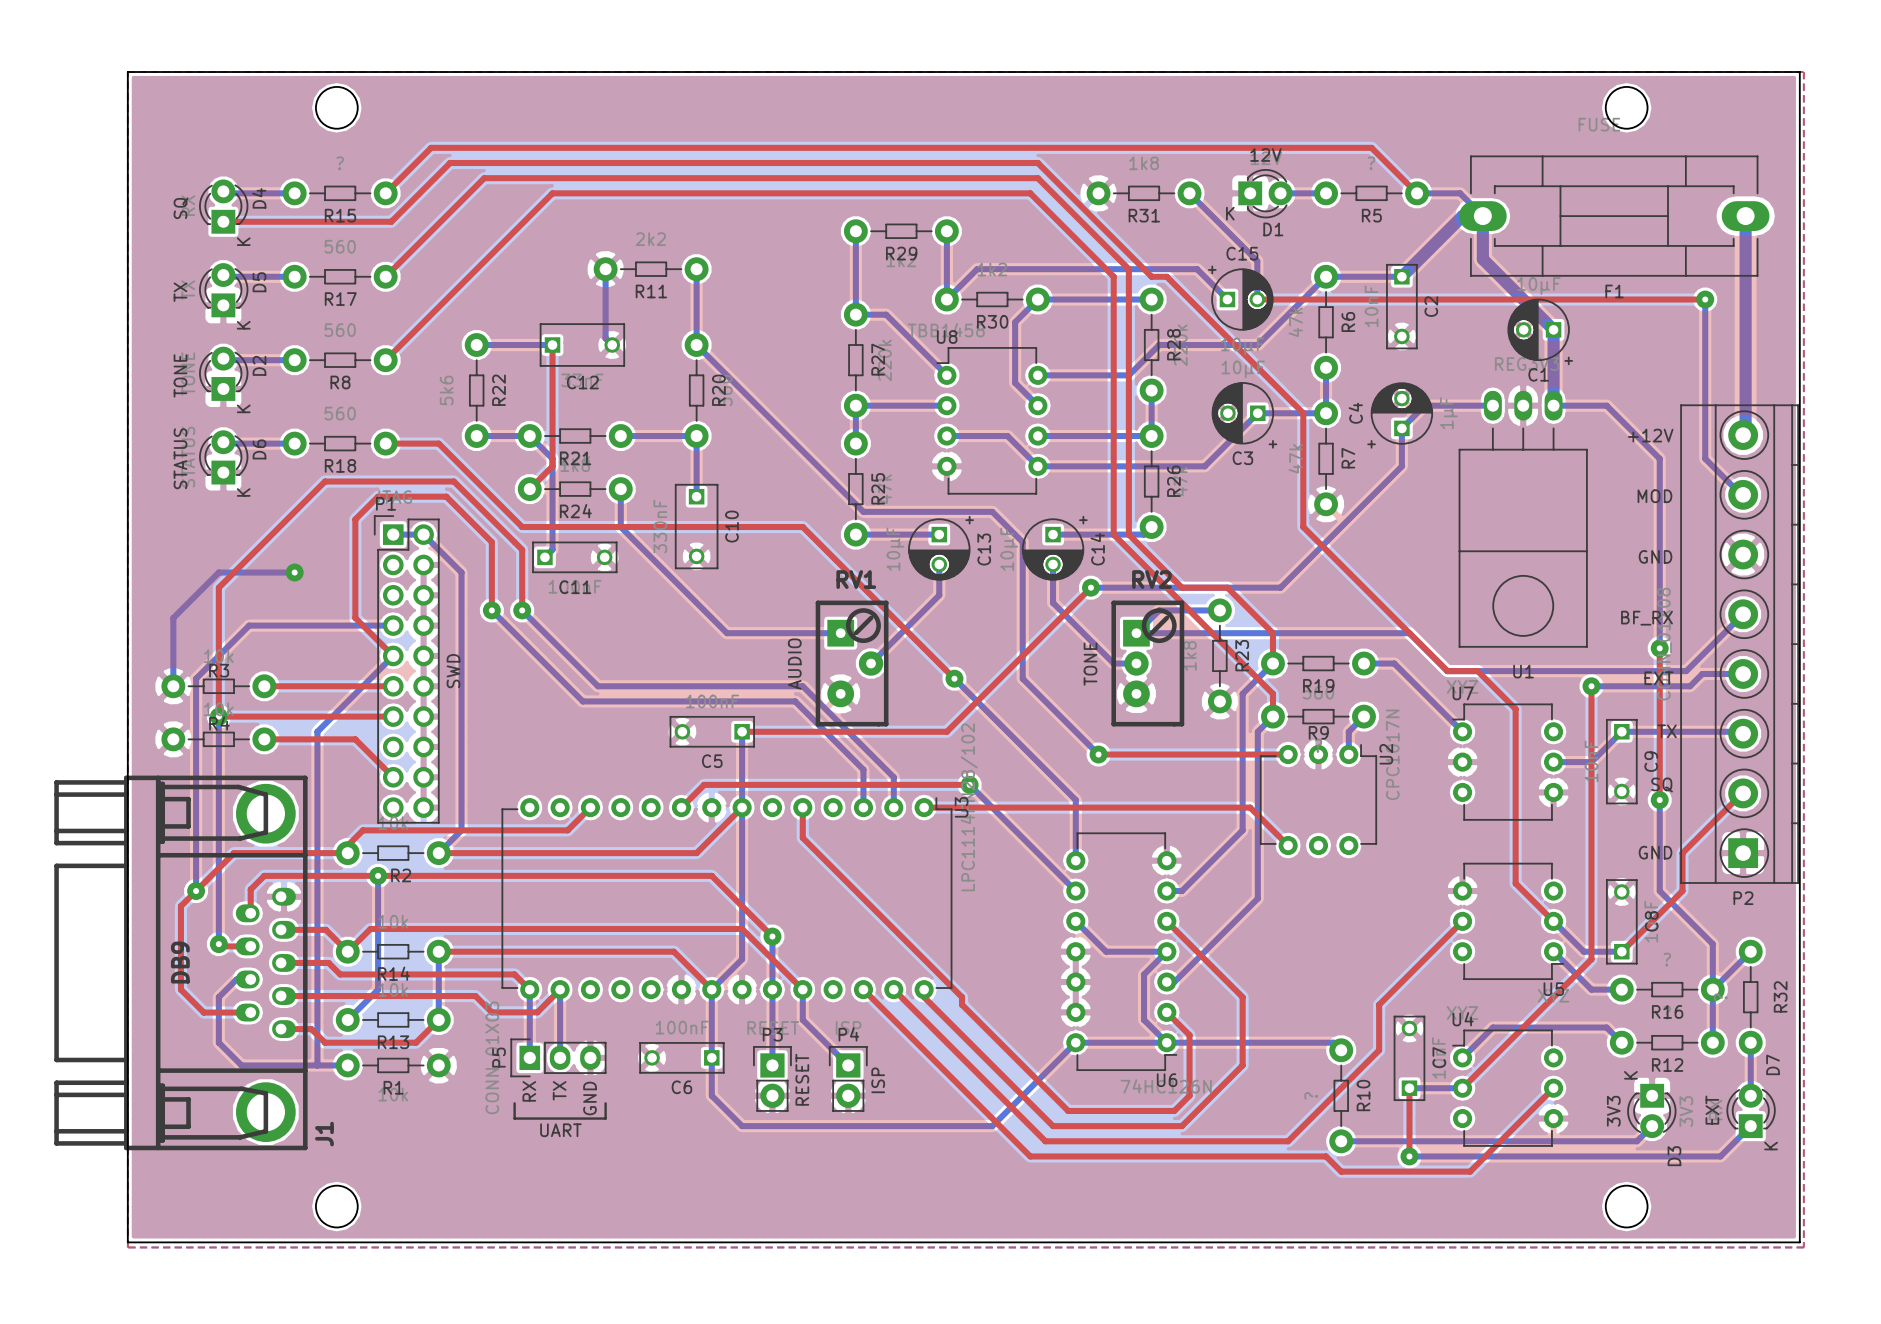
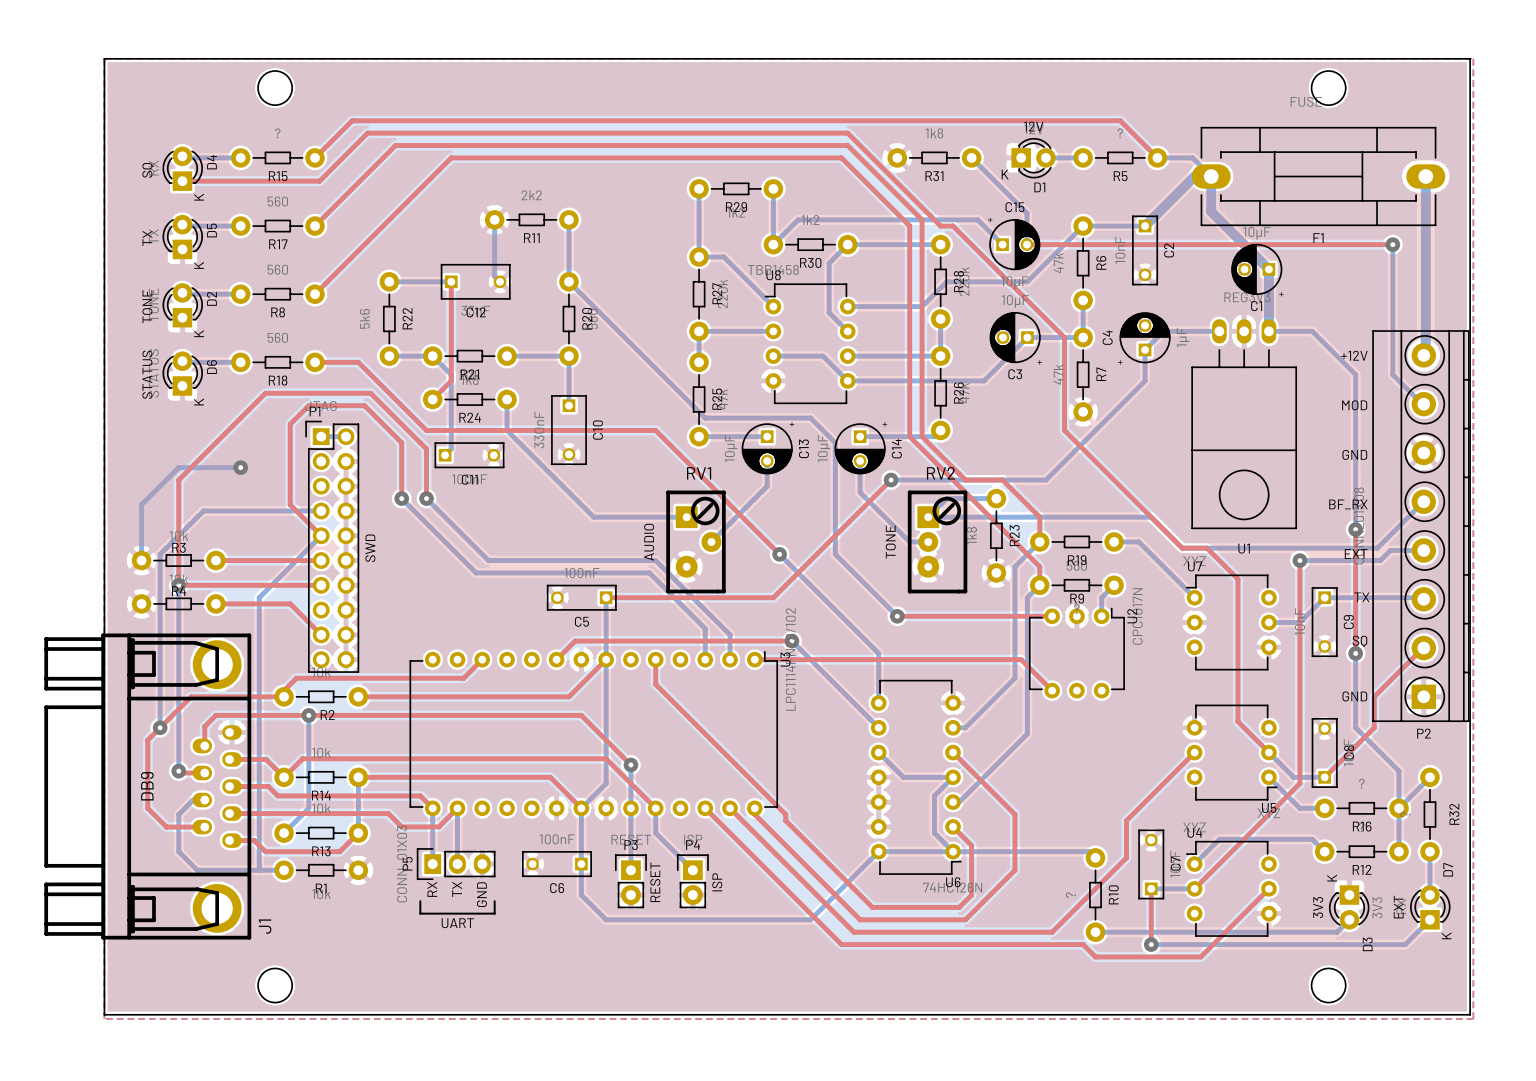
bottom track: (423, 534) (461, 572) (461, 830) (438, 853) -> none

